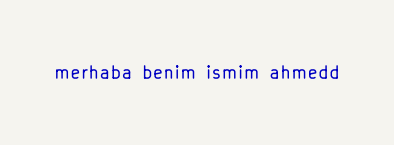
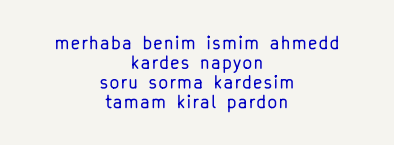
text: none -> kardes napyon (196, 64)
text position: merhaba benim ismim ahmedd (196, 71) -> merhaba benim ismim ahmedd (196, 42)
text: none -> soru sorma kardesim (196, 81)
text: none -> tamam kiral pardon (196, 103)

